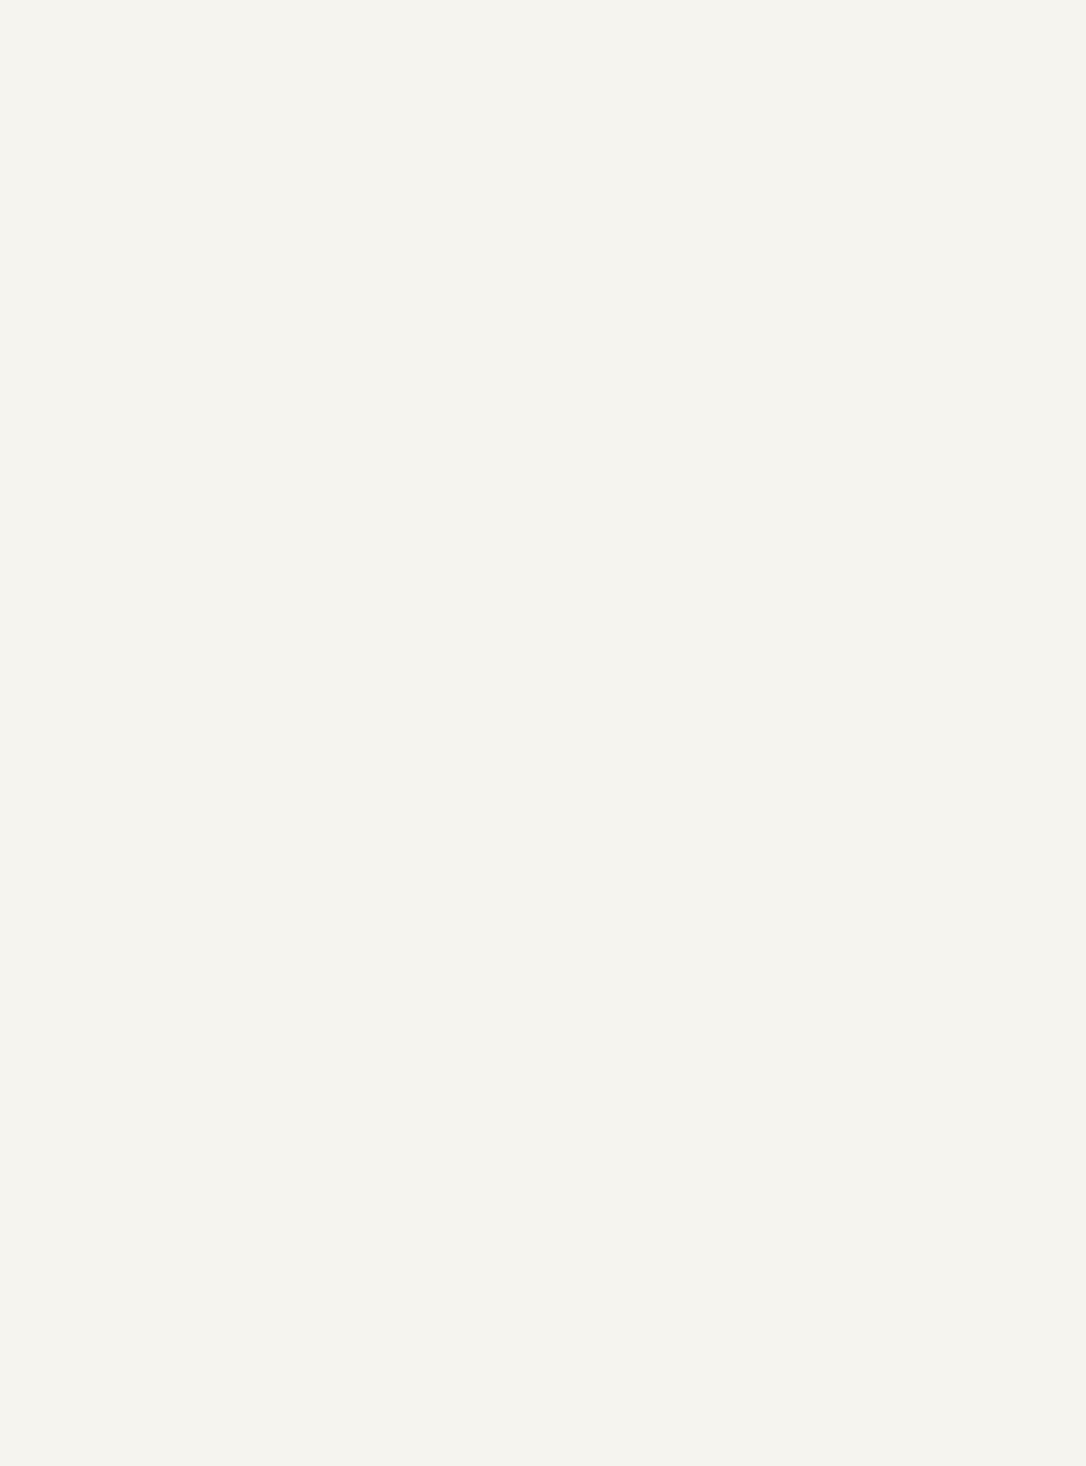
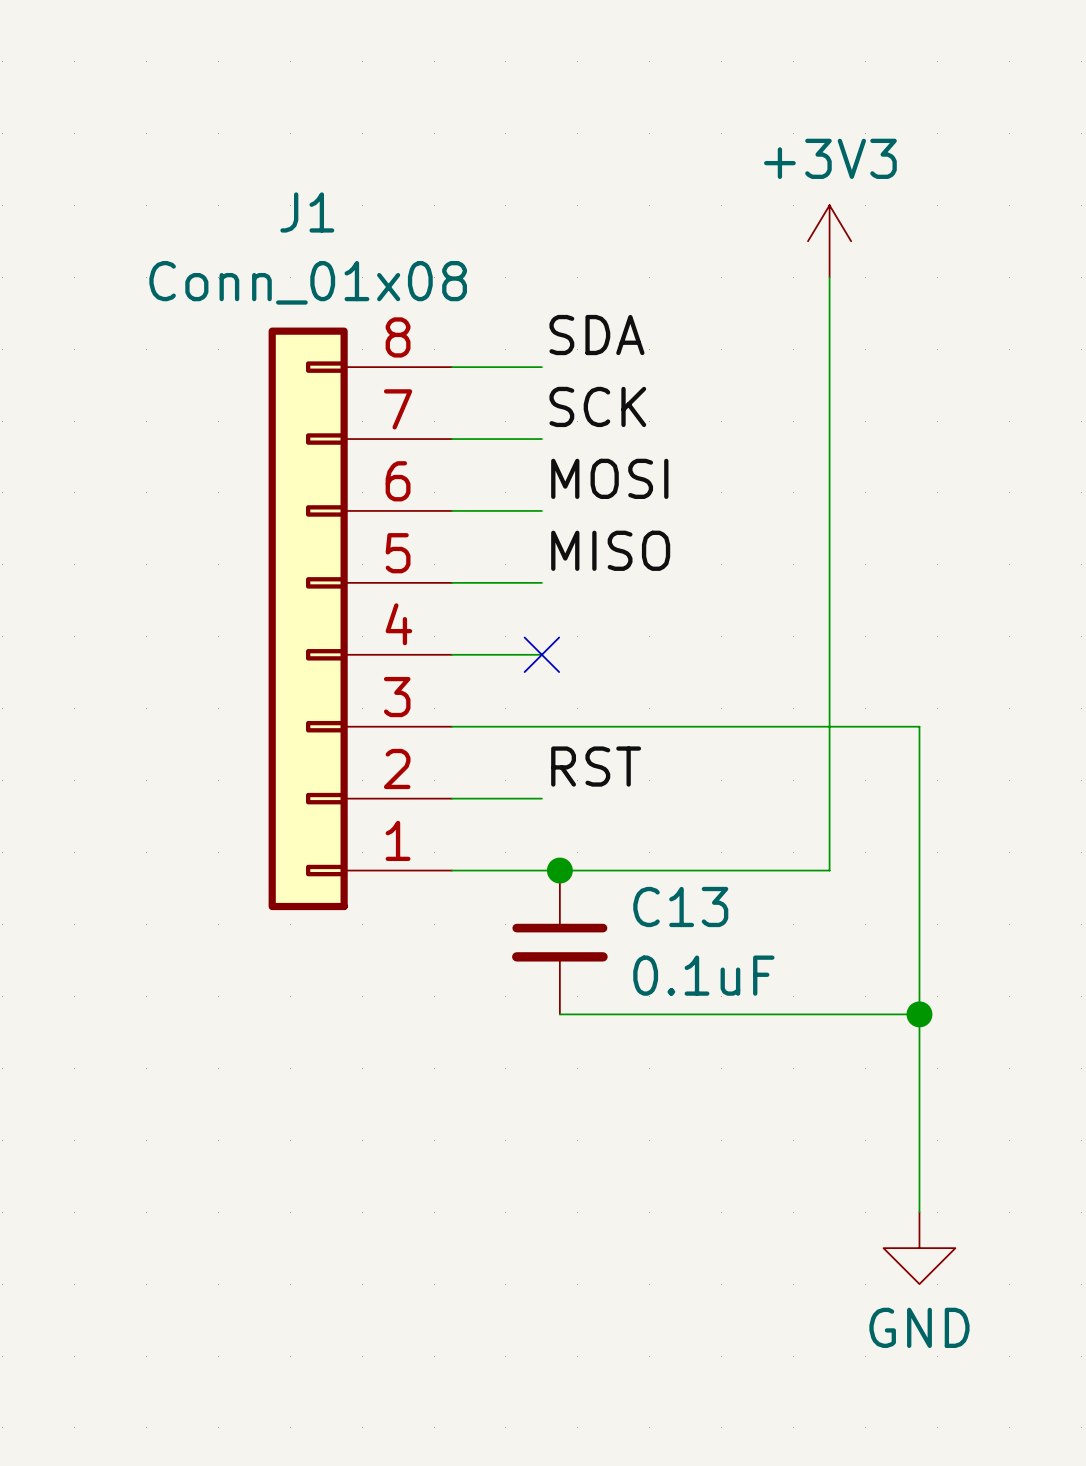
power symbol: none -> +3V3 (829, 241)
wire: none -> (829, 277) (829, 870) (452, 870)
label: none -> SDA (596, 335)
wire: none -> (452, 367) (541, 367)
label: none -> SCK (597, 406)
wire: none -> (452, 439) (541, 439)
label: none -> MOSI (609, 478)
wire: none -> (452, 510) (541, 510)
label: none -> MISO (610, 550)
wire: none -> (452, 582) (541, 582)
J1: none -> Conn_01x08 (360, 618)
wire: none -> (452, 654) (541, 654)
no-connect mark: none -> (541, 654)
wire: none -> (452, 726) (919, 726) (919, 1212)
label: none -> RST (596, 766)
wire: none -> (452, 798) (541, 798)
junction: none -> (559, 870)
C13: none -> 0.1uF (559, 942)
wire: none -> (559, 1014) (919, 1014)
junction: none -> (919, 1014)
power symbol: none -> GND (919, 1248)

